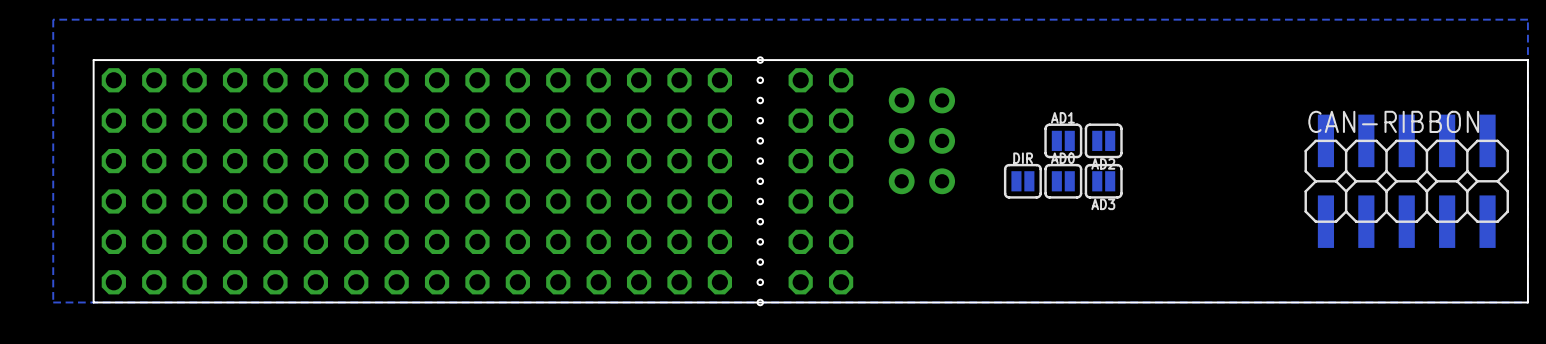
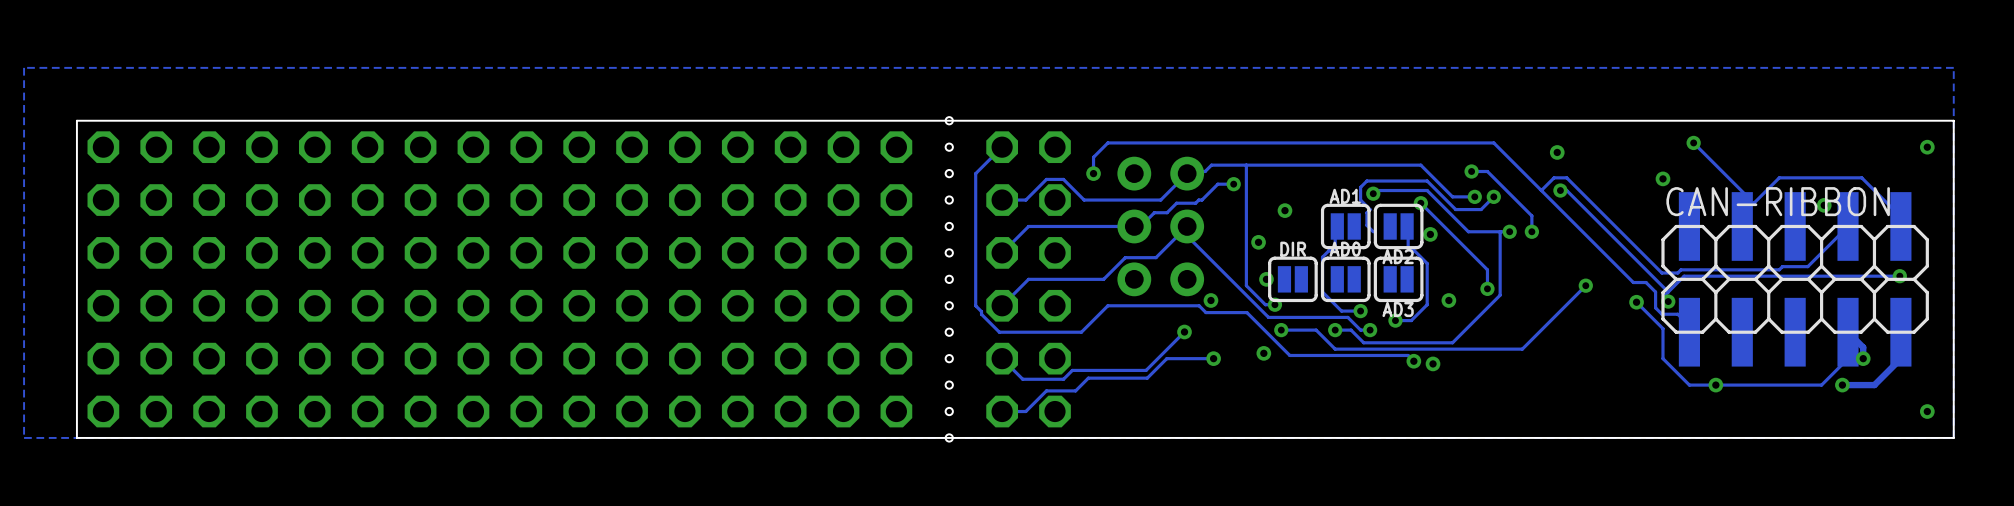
track: none -> (1693, 142) (1744, 193) (1744, 225) (1742, 226) (1744, 203) (1753, 203) (1779, 177) (1861, 177) (1899, 215) (1900, 226)
via: none -> (1693, 142)
track: none -> (1002, 147) (975, 173) (975, 305) (999, 332) (1081, 332) (1107, 305) (1199, 305) (1205, 312) (1246, 312) (1289, 355) (1408, 355) (1413, 361)
via: none -> (1927, 147)
via: none -> (1557, 152)
track: none -> (1246, 165) (1246, 285) (1265, 304) (1274, 304)
track: none -> (1471, 171) (1487, 171) (1531, 215) (1531, 231)
via: none -> (1471, 171)
track: none -> (1093, 173) (1093, 157) (1107, 142) (1493, 142) (1633, 282) (1646, 282) (1655, 292) (1655, 307) (1661, 314) (1677, 314) (1687, 323) (1687, 330) (1689, 332)
via: none -> (1093, 173)
via: none -> (1662, 178)
track: none -> (1233, 184) (1217, 184) (1201, 200) (1195, 203) (1176, 203) (1167, 212) (1154, 212) (1141, 225) (1028, 226) (1002, 252)
via: none -> (1233, 184)
track: none -> (1541, 190) (1554, 177) (1566, 177) (1661, 273) (1677, 273) (1680, 269) (1779, 269) (1782, 266) (1807, 266) (1848, 226)
track: none -> (1560, 190) (1566, 190) (1668, 292)
via: none -> (1560, 190)
track: none -> (1373, 193) (1376, 190) (1427, 190) (1468, 231) (1509, 231)
via: none -> (1373, 193)
track: none -> (1474, 196) (1452, 196) (1420, 165) (1211, 165) (1205, 171) (1189, 171) (1160, 200) (1084, 200) (1063, 179) (1046, 179) (1025, 200) (1002, 200)
via: none -> (1474, 196)
track: none -> (1493, 196) (1481, 209) (1455, 209) (1427, 181) (1366, 181) (1360, 187) (1360, 200) (1370, 209) (1366, 212) (1366, 225) (1373, 231)
via: none -> (1493, 196)
track: none -> (1420, 203) (1487, 269) (1487, 288)
via: none -> (1420, 203)
via: none -> (1824, 205)
via: none -> (1284, 210)
track: none -> (1337, 226) (1335, 228) (1335, 247) (1322, 257) (1322, 292) (1341, 311) (1360, 311)
track: none -> (1407, 226) (1408, 247) (1414, 250) (1427, 263) (1427, 304) (1411, 320) (1395, 320)
track: none -> (1500, 231) (1500, 295) (1452, 342) (1363, 342) (1351, 330) (1335, 330)
via: none -> (1509, 231)
via: none -> (1531, 231)
via: none -> (1430, 234)
via: none -> (1258, 242)
track: none -> (1899, 276) (1684, 276) (1665, 295) (1668, 301)
via: none -> (1899, 276)
via: none -> (1266, 279)
track: none -> (1585, 285) (1522, 349) (1335, 349) (1316, 330) (1281, 330)
via: none -> (1585, 285)
via: none -> (1487, 288)
via: none -> (1210, 300)
via: none -> (1448, 300)
track: none -> (1636, 302) (1662, 328) (1662, 358) (1689, 385) (1821, 385) (1848, 358) (1848, 332) (1863, 347) (1863, 358)
via: none -> (1636, 302)
via: none -> (1668, 301)
via: none -> (1274, 304)
track: none -> (1002, 305) (1028, 279) (1103, 279) (1125, 257) (1155, 257) (1187, 226) (1182, 231) (1268, 317) (1347, 317) (1360, 330) (1370, 330)
via: none -> (1360, 311)
via: none -> (1395, 320)
via: none -> (1281, 330)
via: none -> (1335, 330)
via: none -> (1370, 330)
track: none -> (1184, 332) (1146, 370) (1072, 370) (1063, 379) (1022, 379) (1002, 358)
via: none -> (1184, 332)
track: none -> (1900, 332) (1900, 358) (1874, 385) (1842, 385)
via: none -> (1263, 353)
track: none -> (1213, 358) (1166, 358) (1147, 378) (1088, 378) (1075, 390) (1046, 390) (1025, 411) (1002, 411)
via: none -> (1213, 358)
via: none -> (1863, 358)
via: none -> (1413, 361)
via: none -> (1433, 363)
via: none -> (1715, 385)
via: none -> (1842, 385)
via: none -> (1927, 411)

